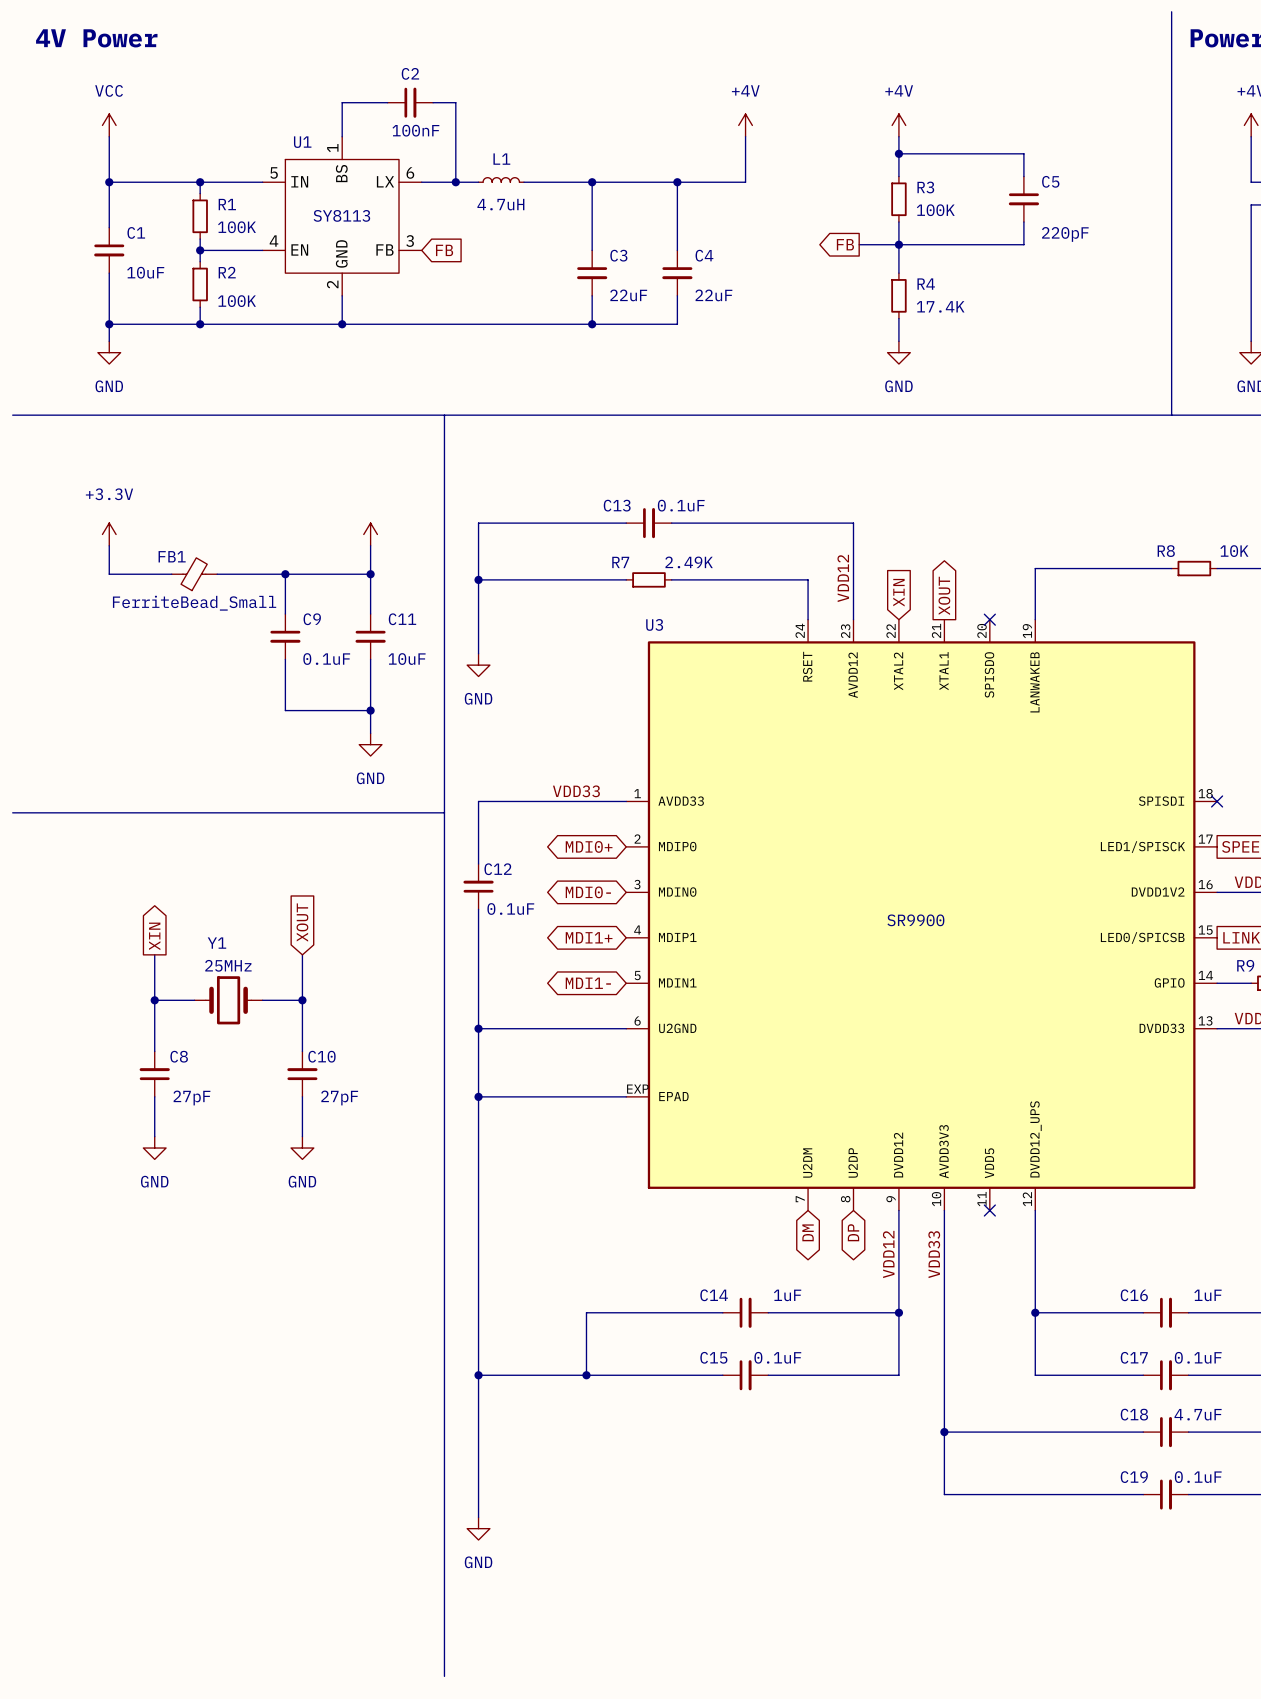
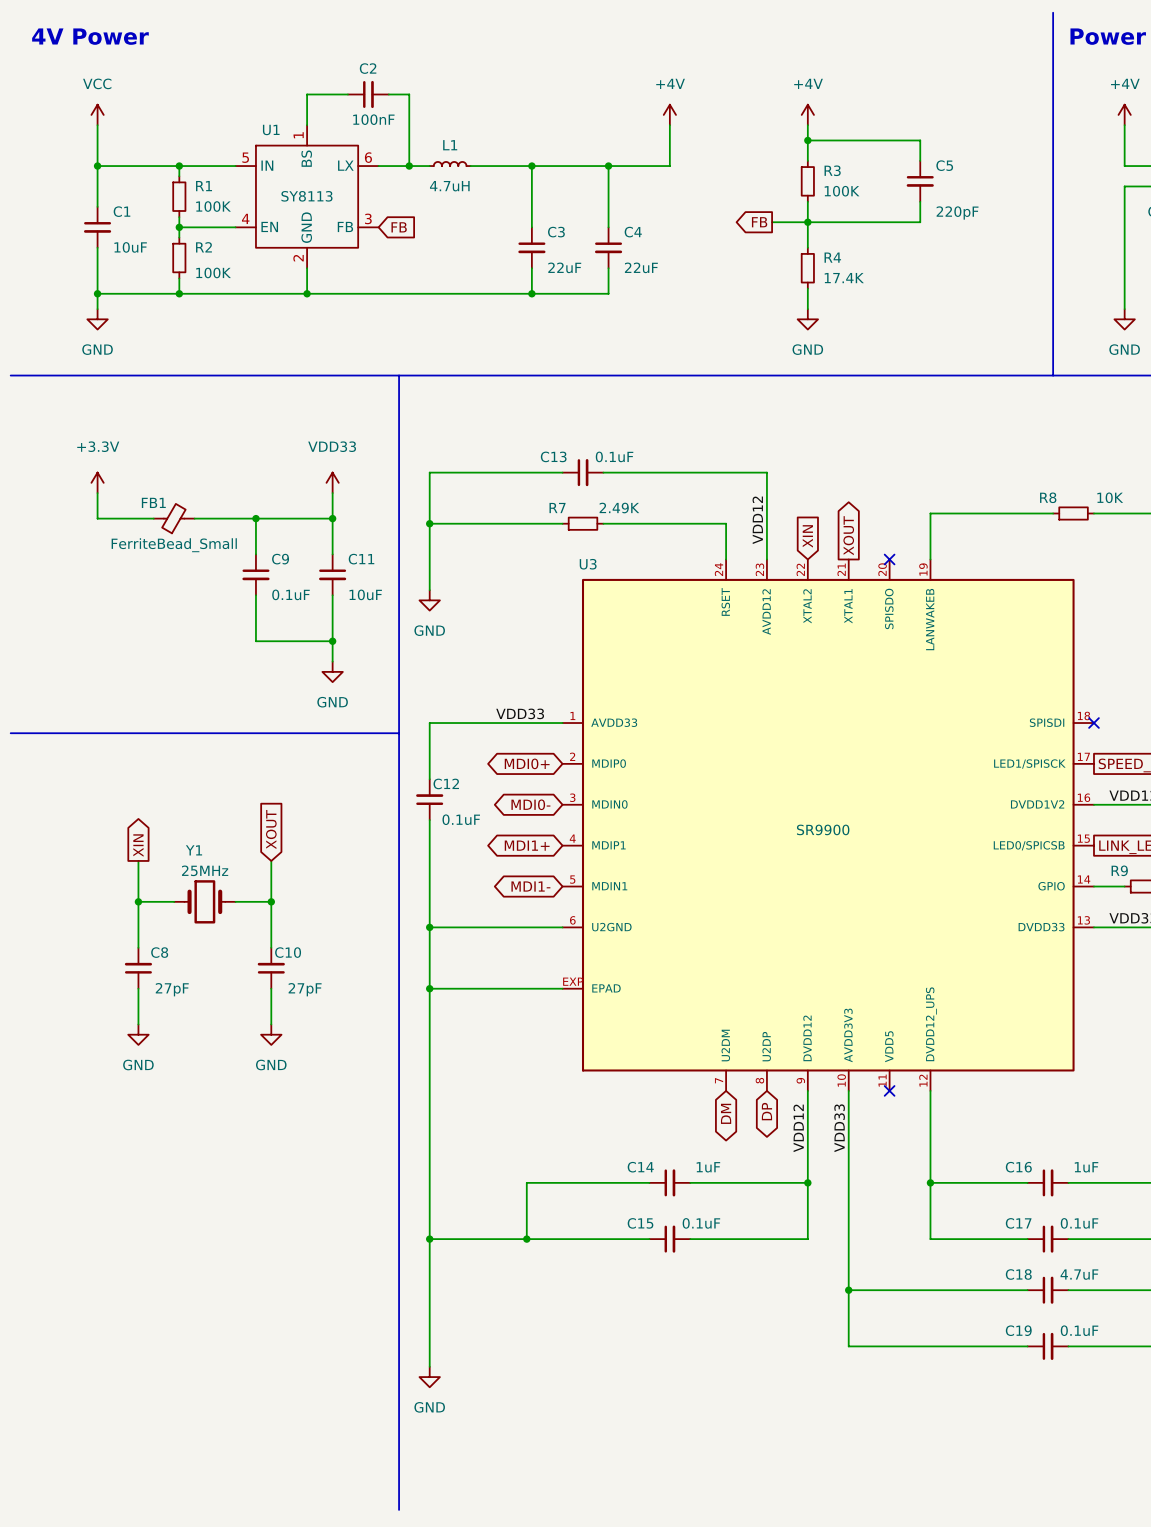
power symbol text: none -> VDD33 (332, 446)

